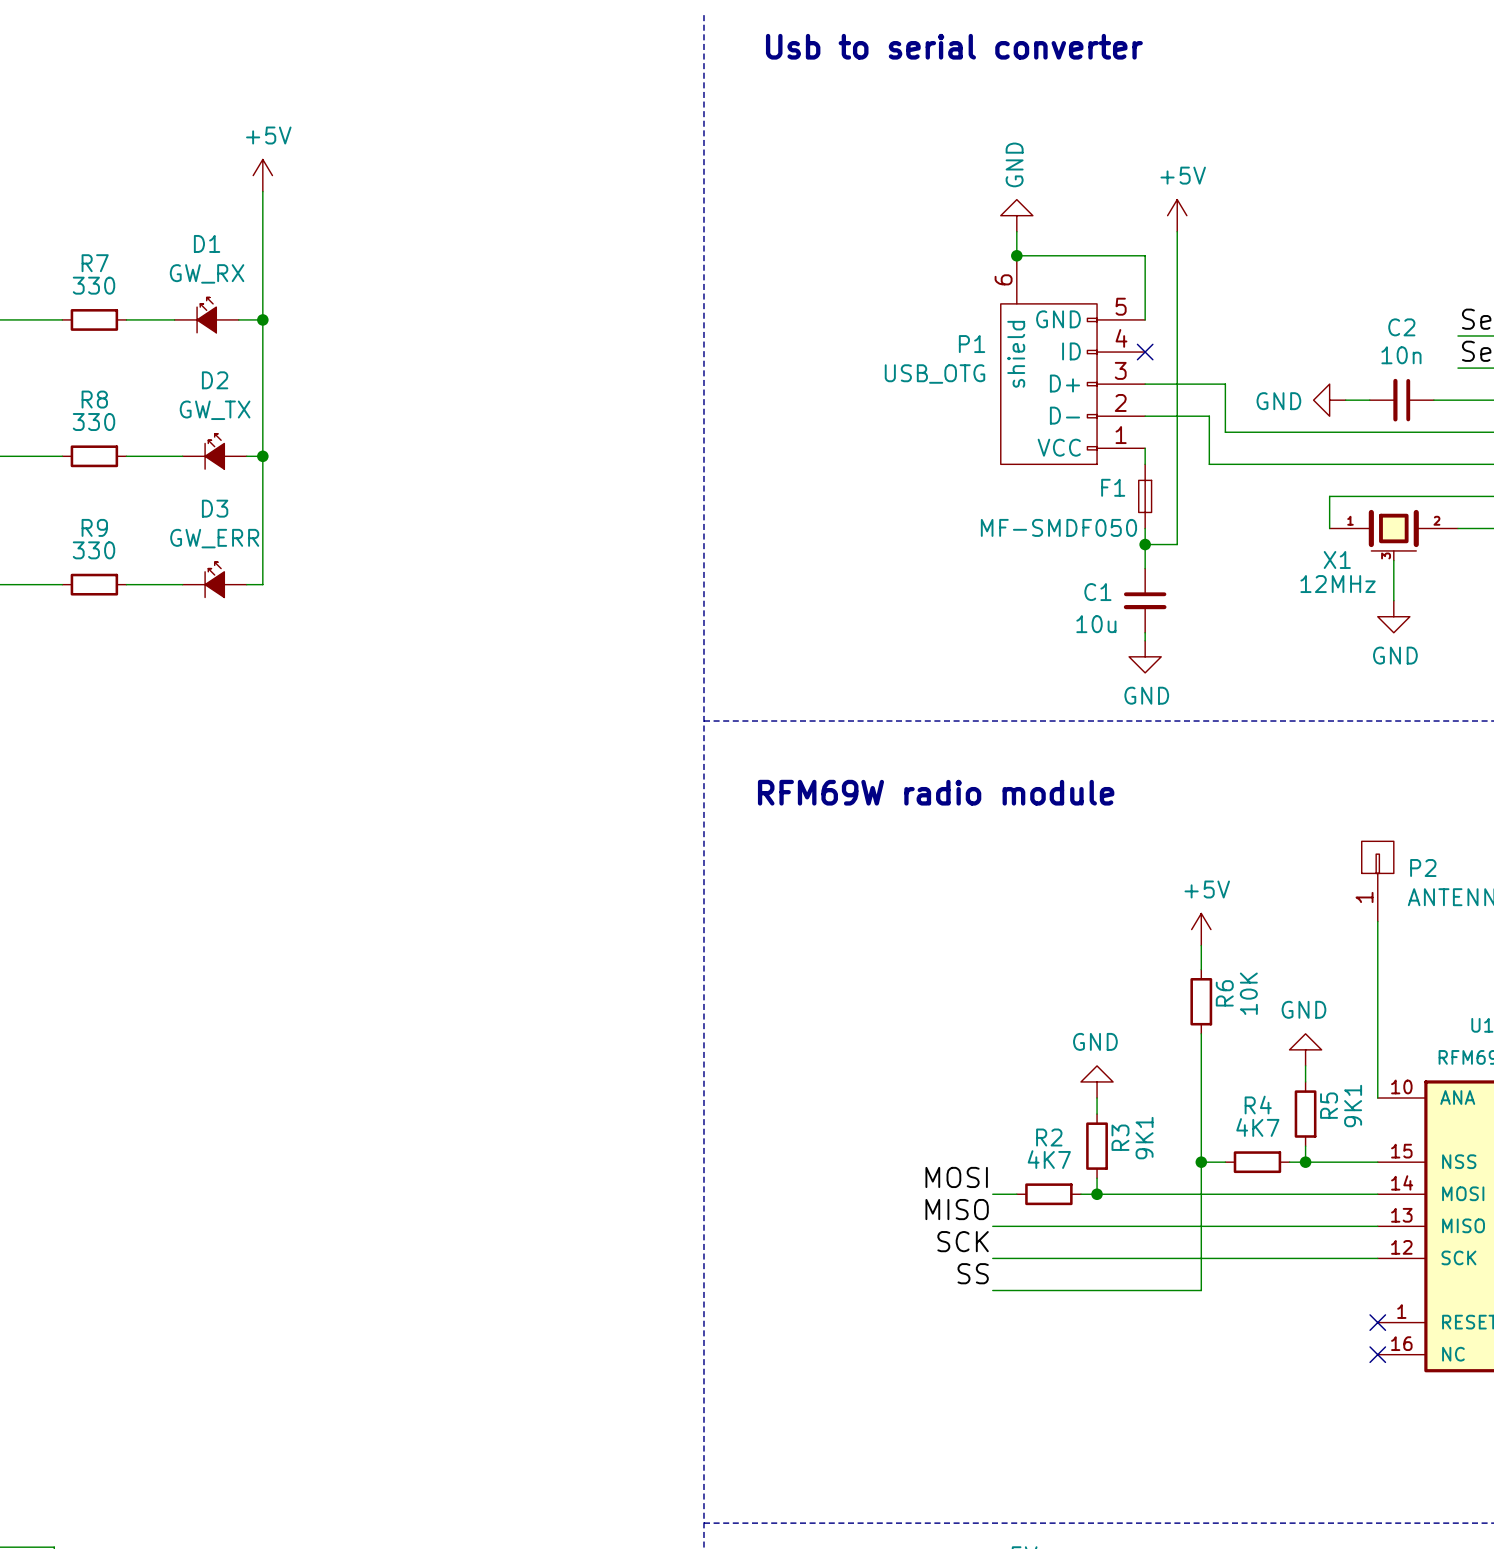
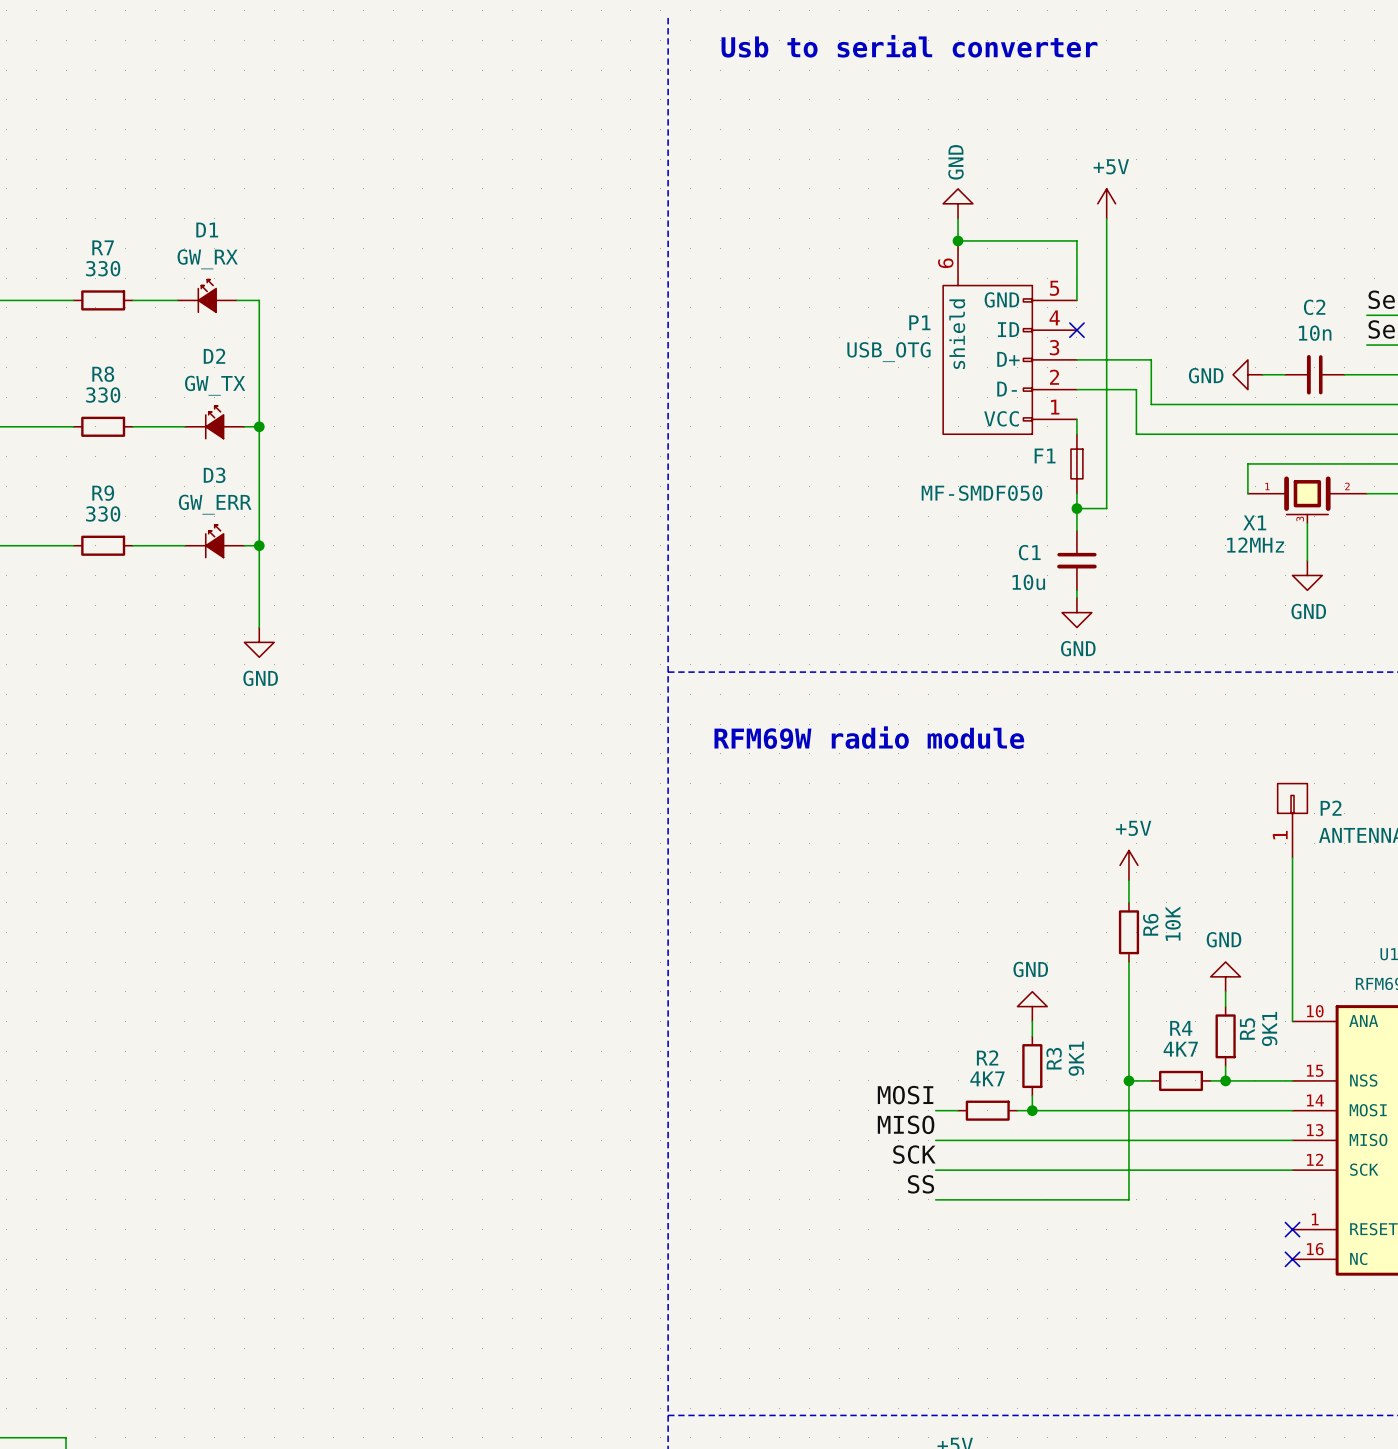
power symbol: +5V (262, 175) -> none
wire: (262, 191) (262, 319) -> none
junction: (262, 319) -> none
wire: none -> (259, 545) (259, 627)
junction: none -> (259, 545)
power symbol: none -> GND (259, 642)

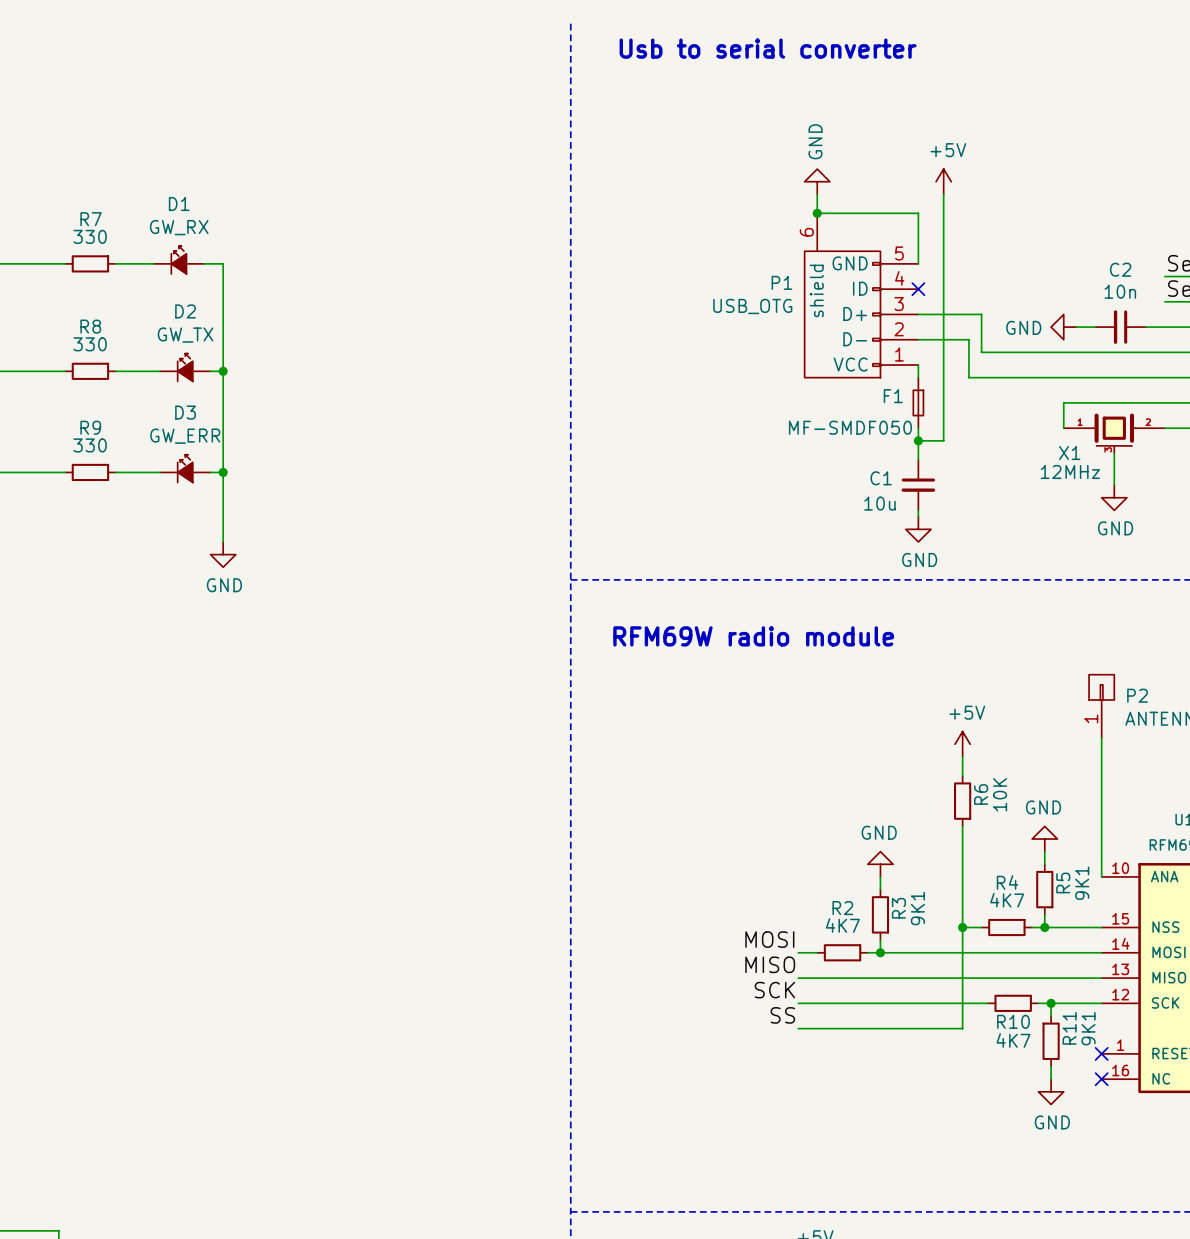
wire: (1158, 1170) (1218, 1170) -> none
R10: none -> 4K7 (1013, 1003)
wire: none -> (1051, 1003) (1051, 1015)
junction: none -> (1051, 1003)
R11: none -> 9K1 (1051, 1041)
wire: none -> (1051, 1066) (1051, 1079)
power symbol: none -> GND (1051, 1091)

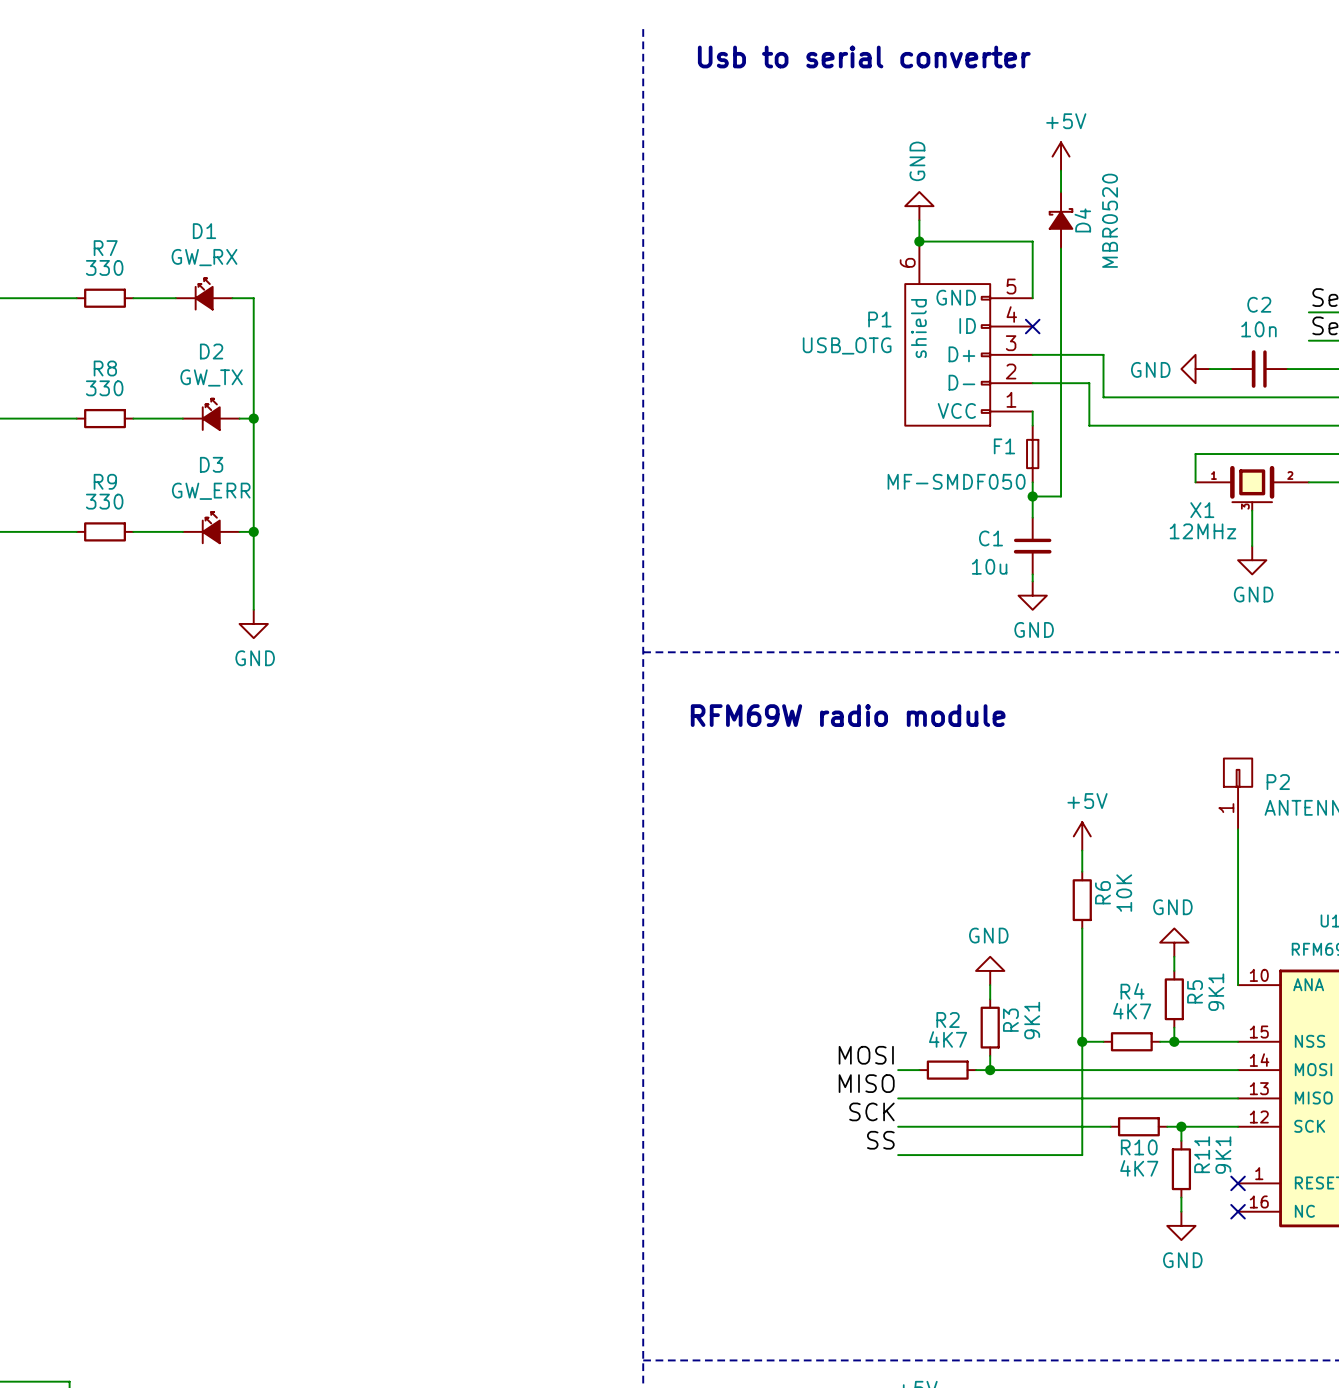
wire: none -> (1061, 170) (1061, 191)
power symbol position: +5V (943, 181) -> +5V (1061, 156)
D4: none -> MBR0520 (1061, 220)

